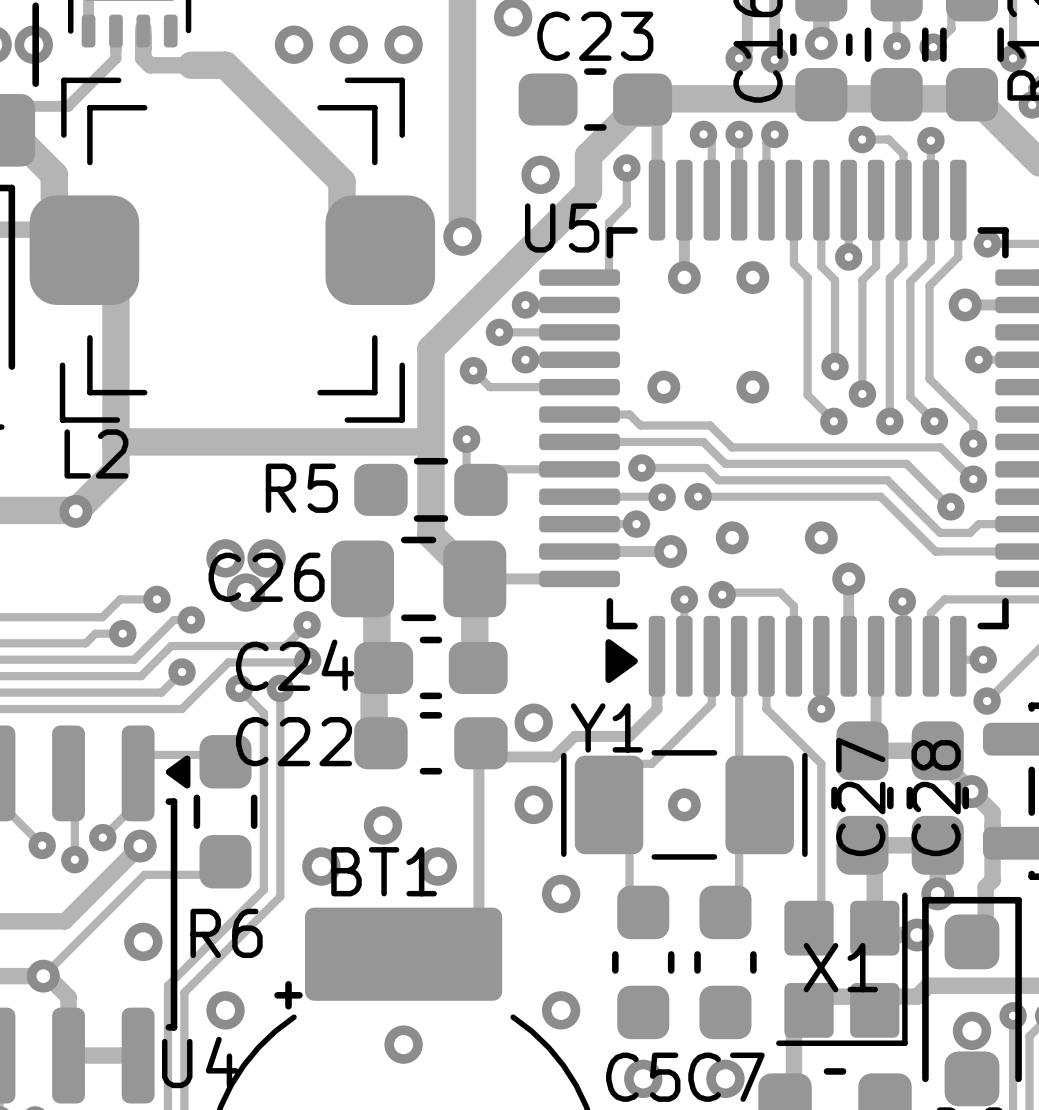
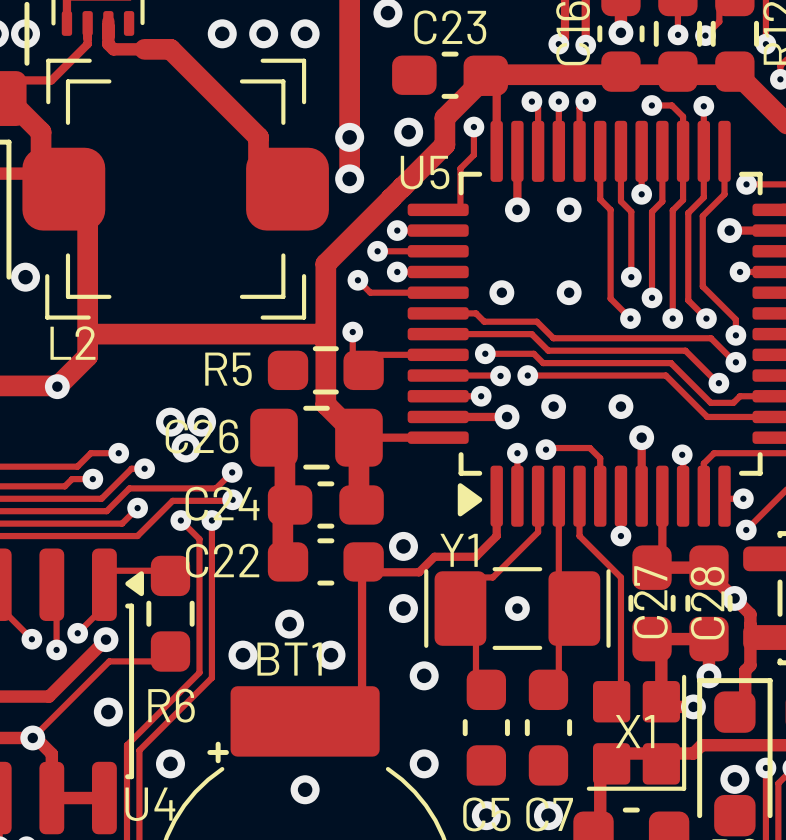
via: none -> (349, 137)
via: none -> (25, 277)

